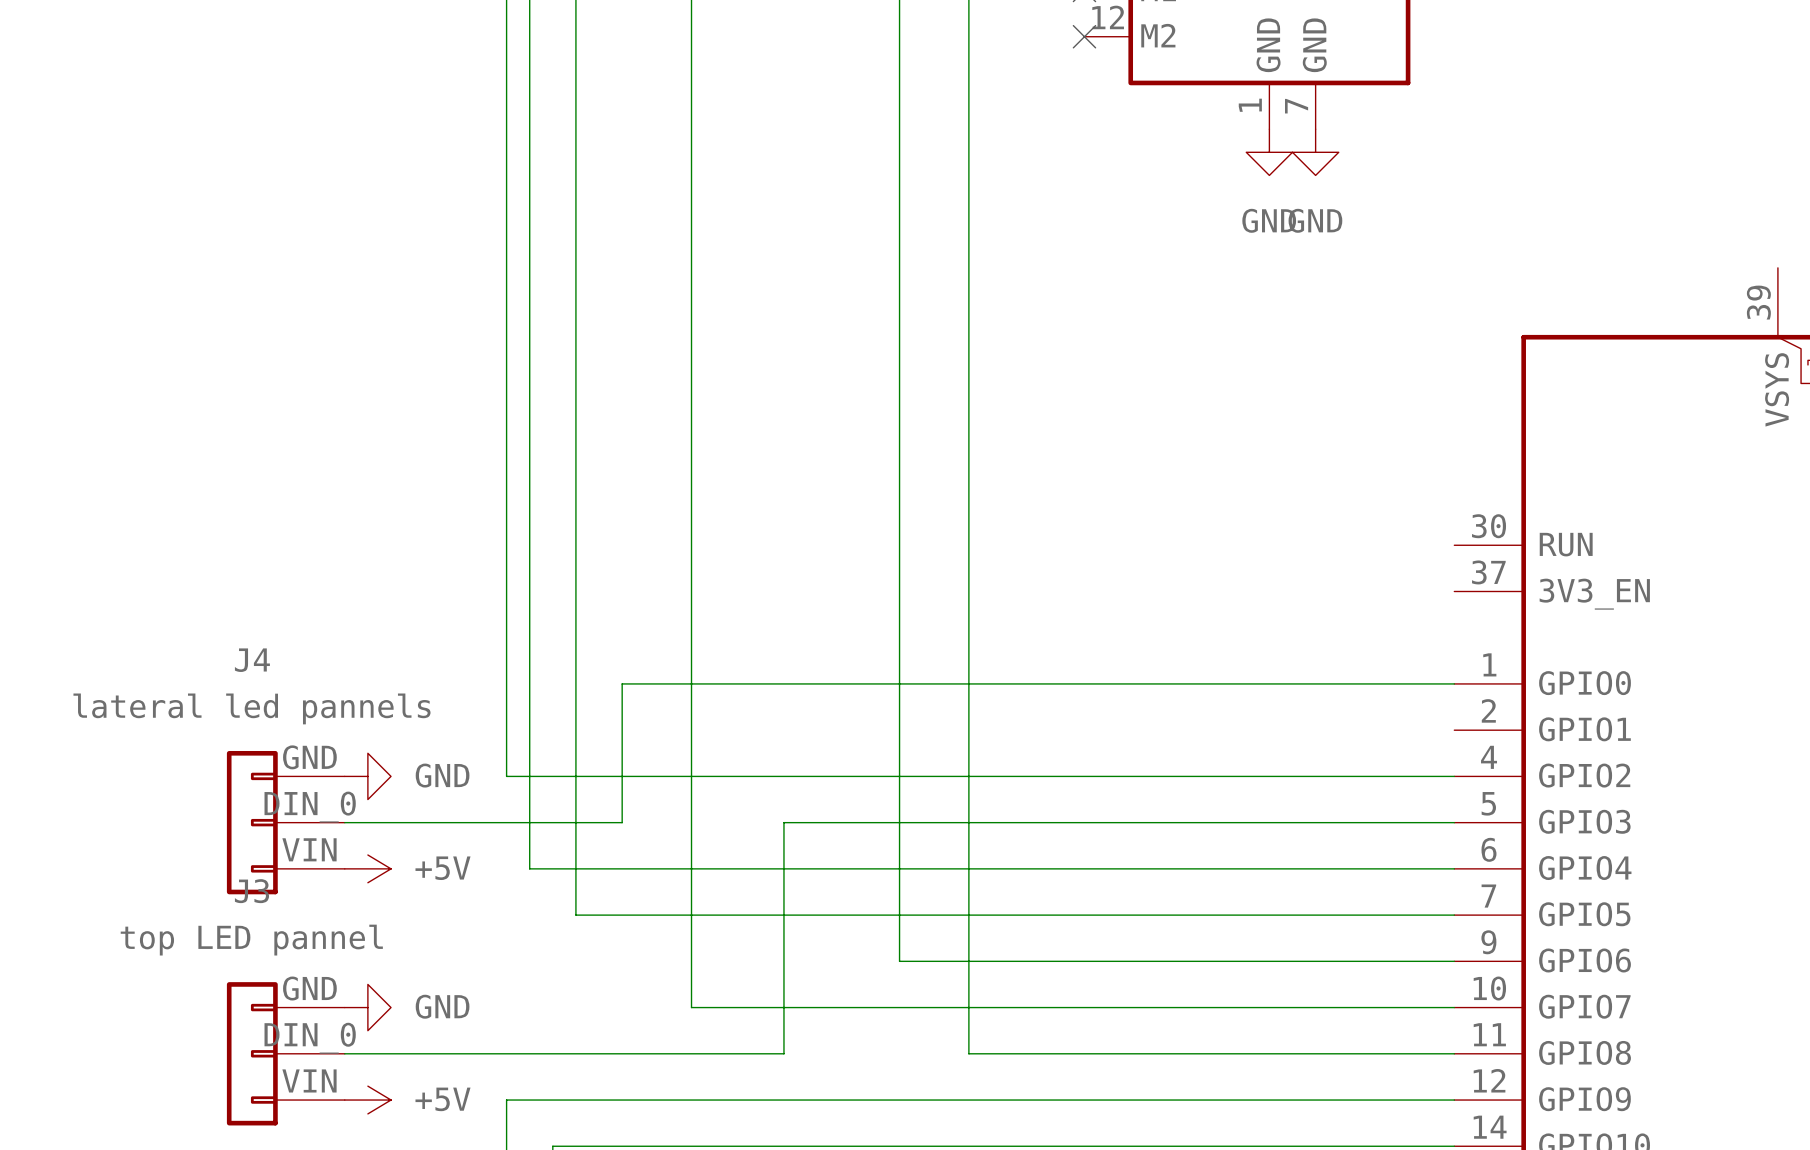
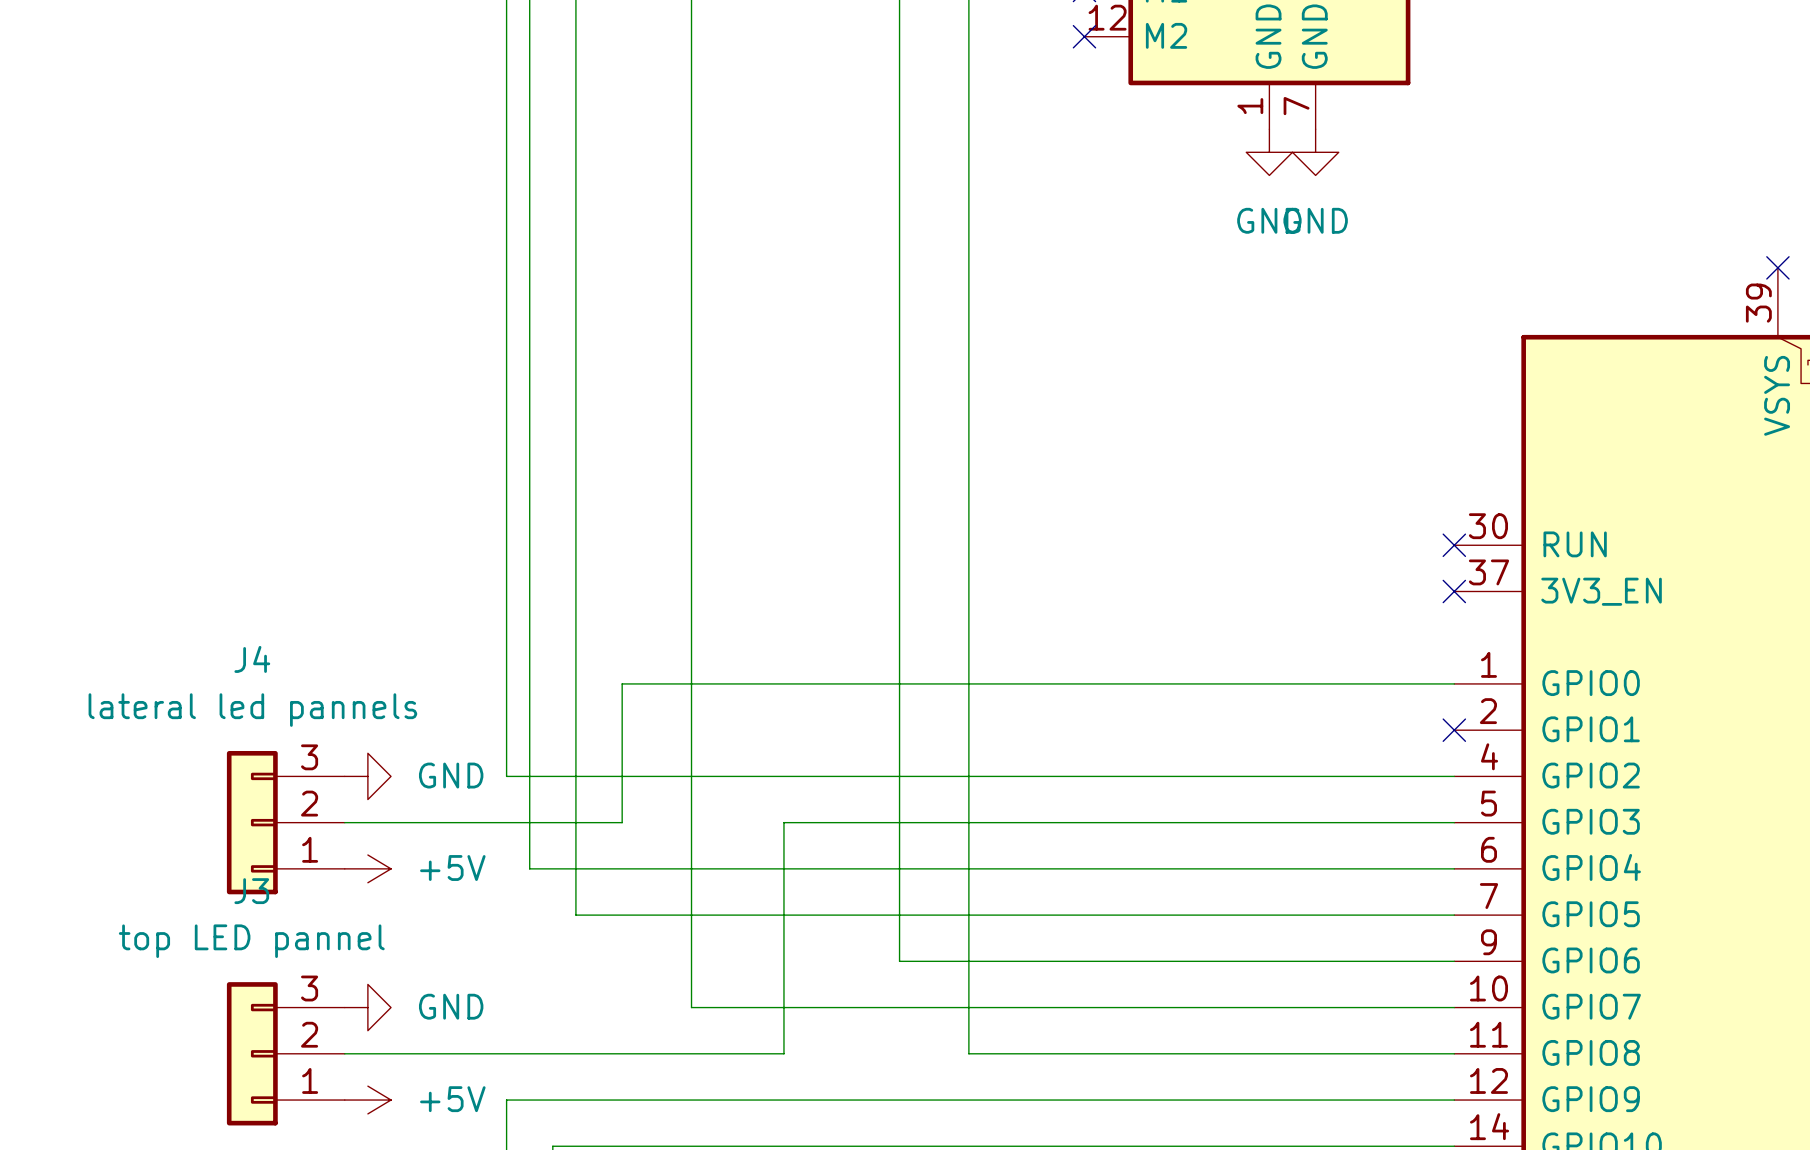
no-connect mark: none -> (1777, 267)
no-connect mark: none -> (1454, 545)
no-connect mark: none -> (1454, 591)
no-connect mark: none -> (1454, 730)
J4 pin number: GND (309, 757) -> 3 (309, 757)
J4 pin number: DIN_0 (310, 807) -> 2 (309, 803)
J4 pin number: VIN (309, 849) -> 1 (310, 849)
J3 pin number: GND (309, 988) -> 3 (309, 988)
J3 pin number: DIN_0 (310, 1038) -> 2 (309, 1034)
J3 pin number: VIN (309, 1080) -> 1 (310, 1080)

